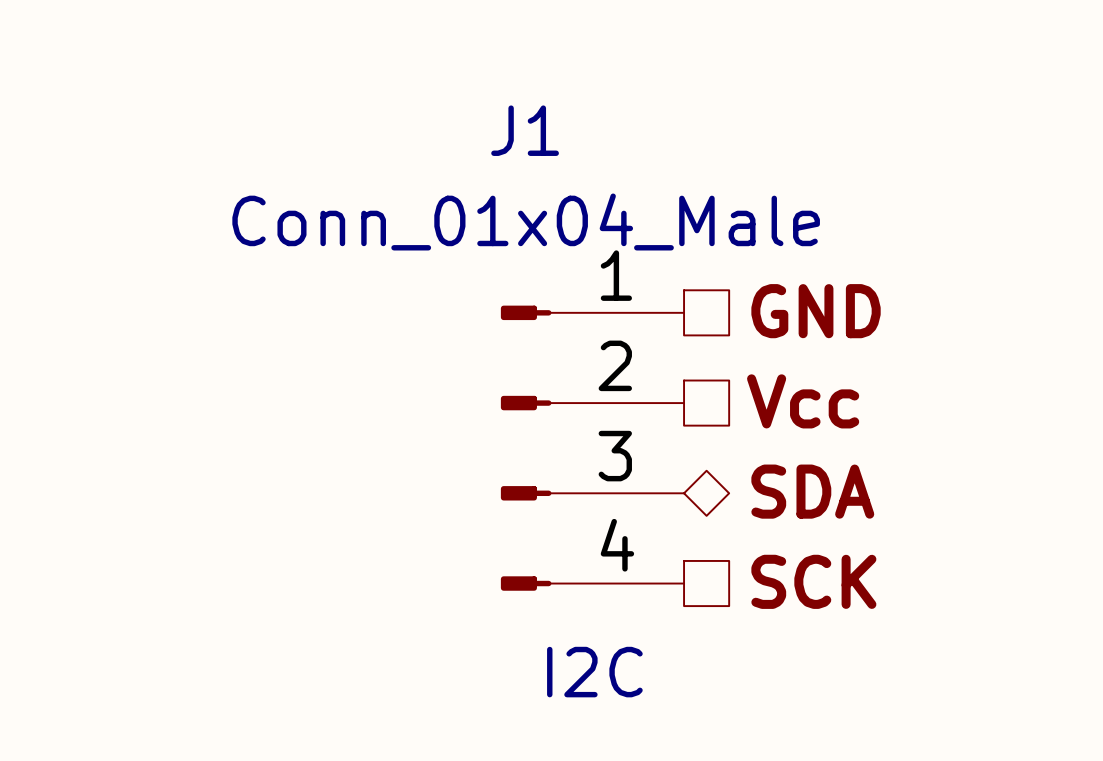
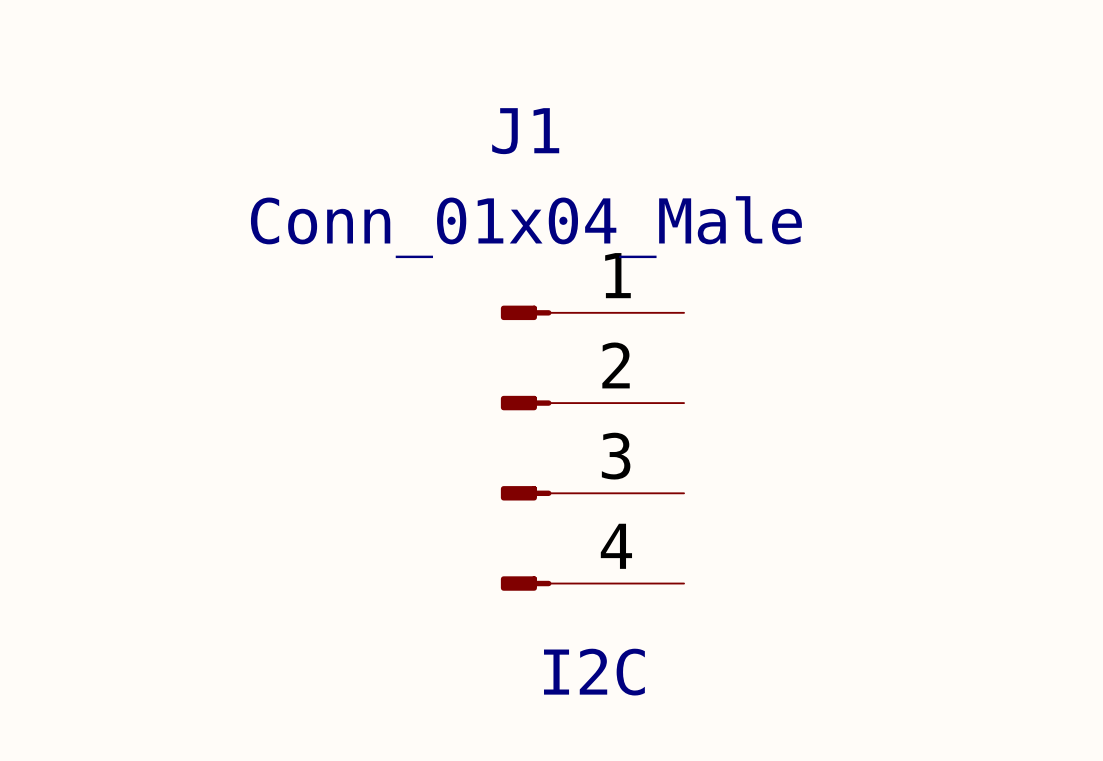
hierarchical label: GND (816, 311) -> none
hierarchical label: Vcc (803, 401) -> none
hierarchical label: SDA (812, 491) -> none
hierarchical label: SCK (813, 581) -> none

